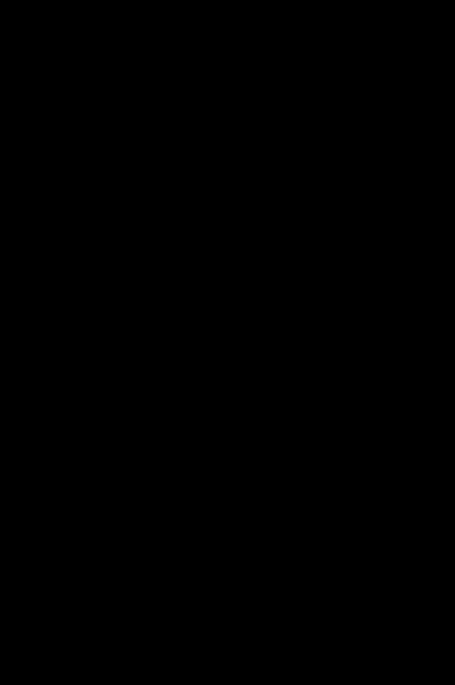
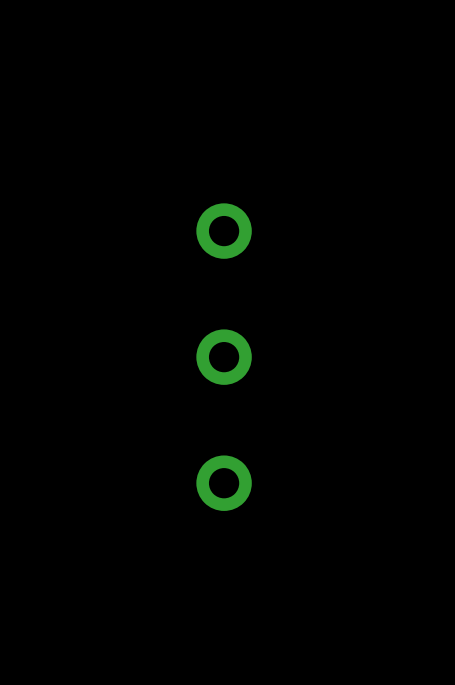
part: none -> (224, 357)

